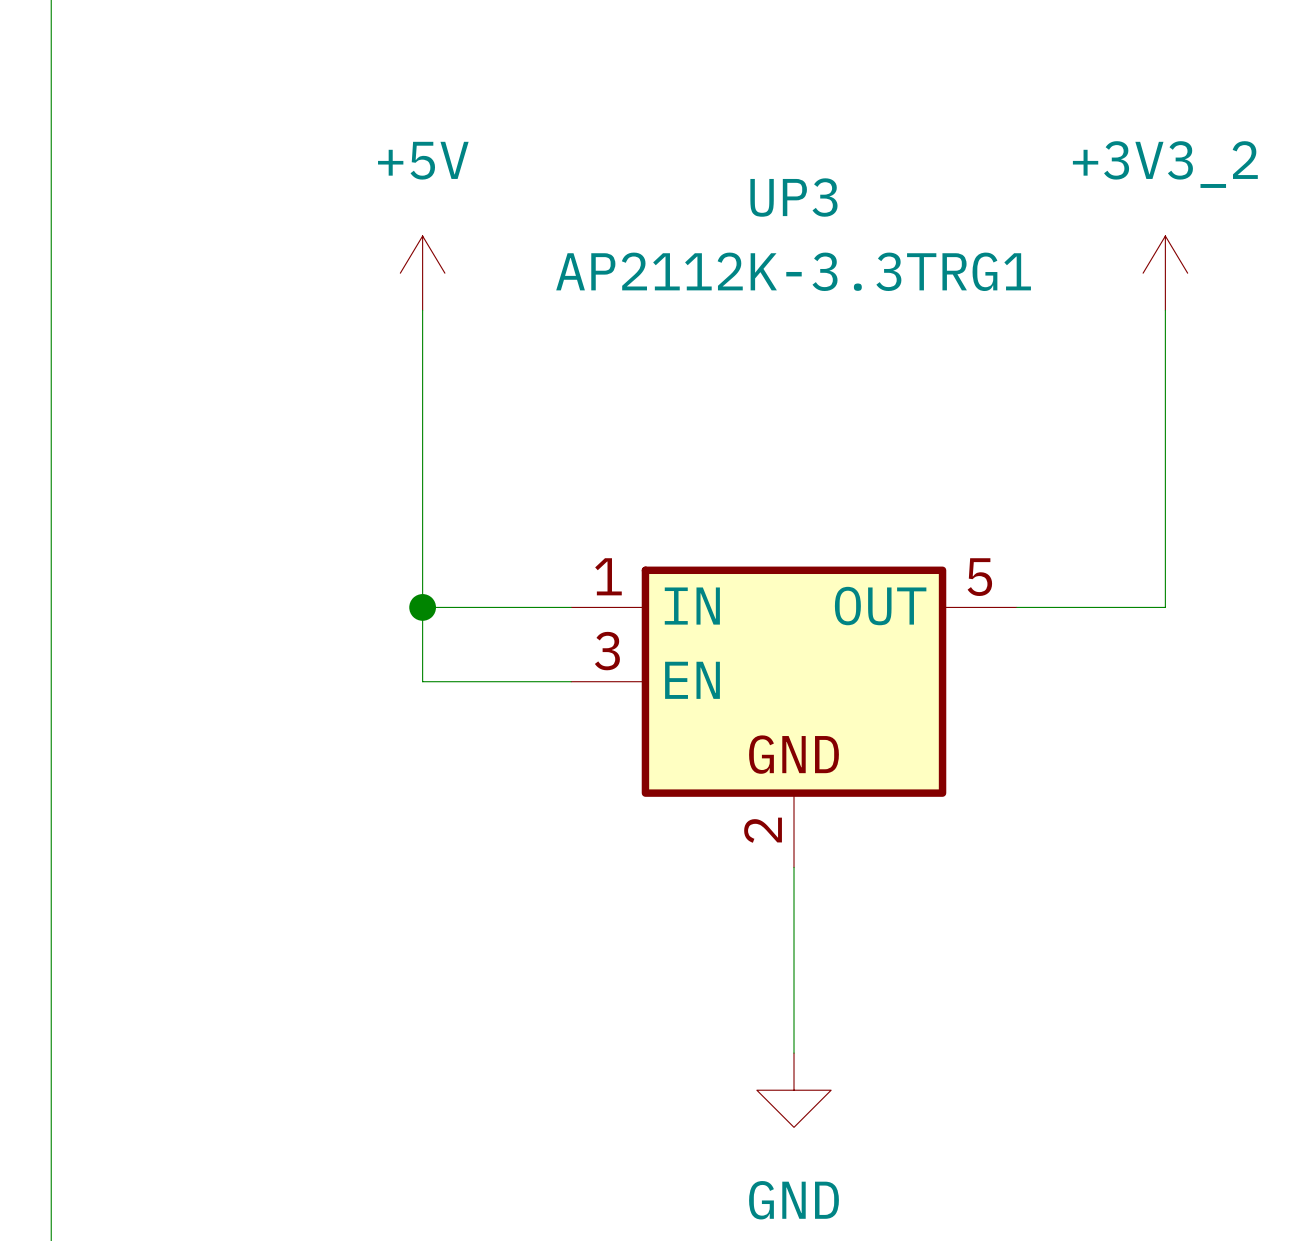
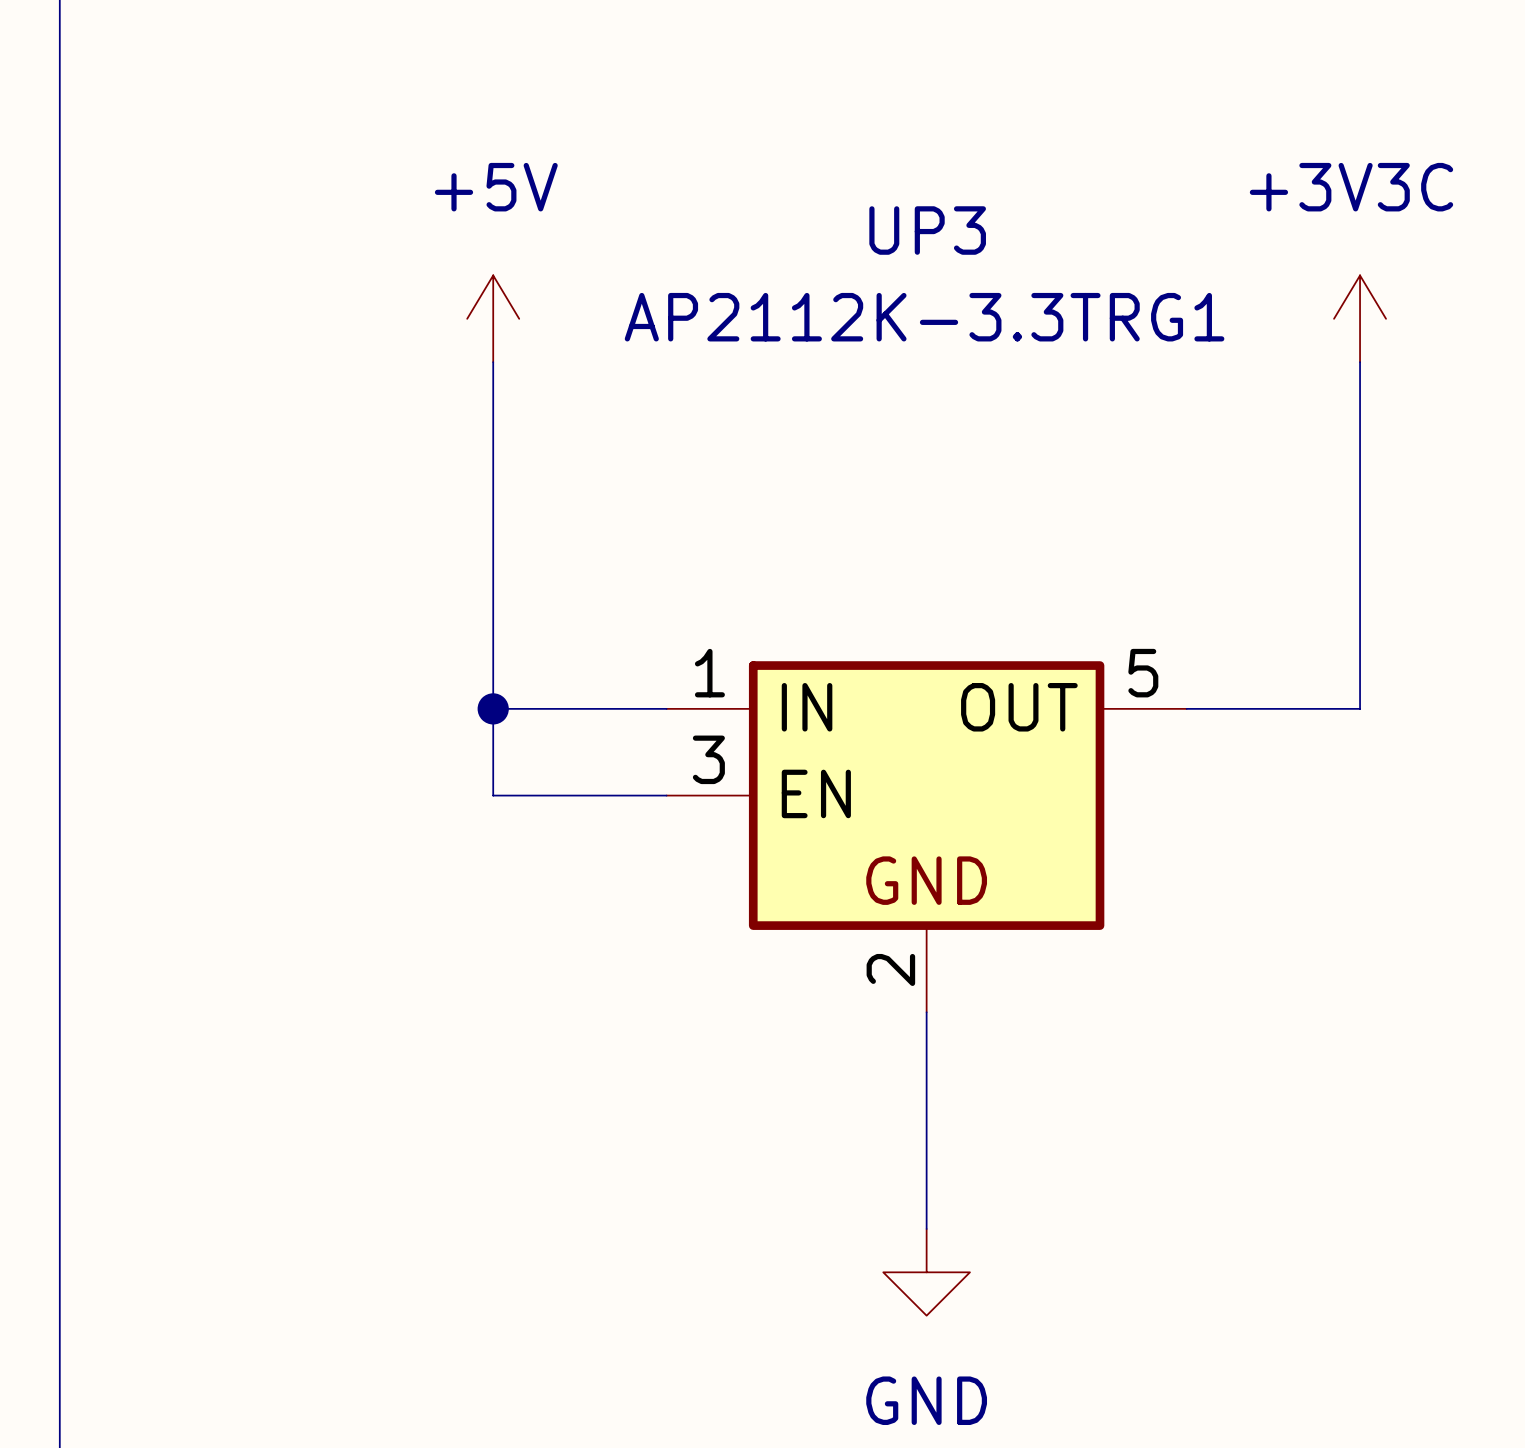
power symbol: +3V3_2 (1165, 273) -> +3V3C (1360, 318)

